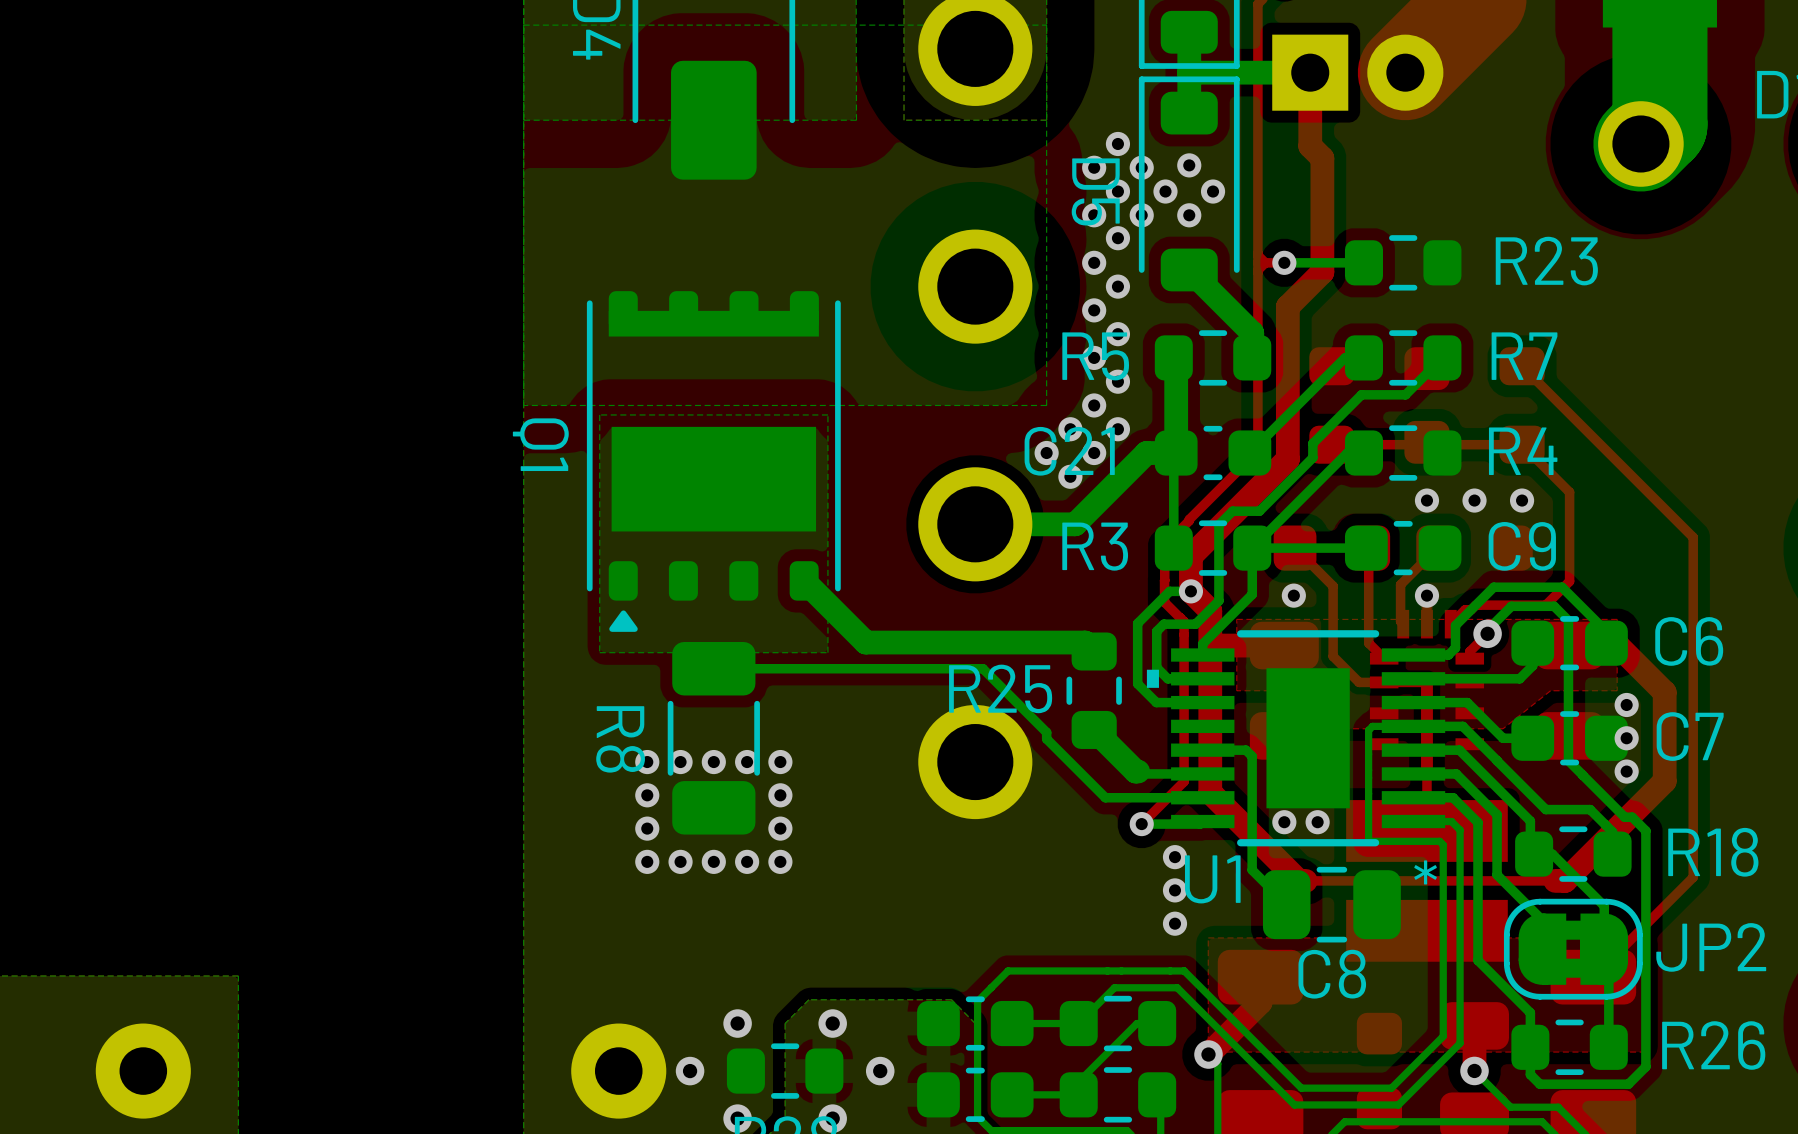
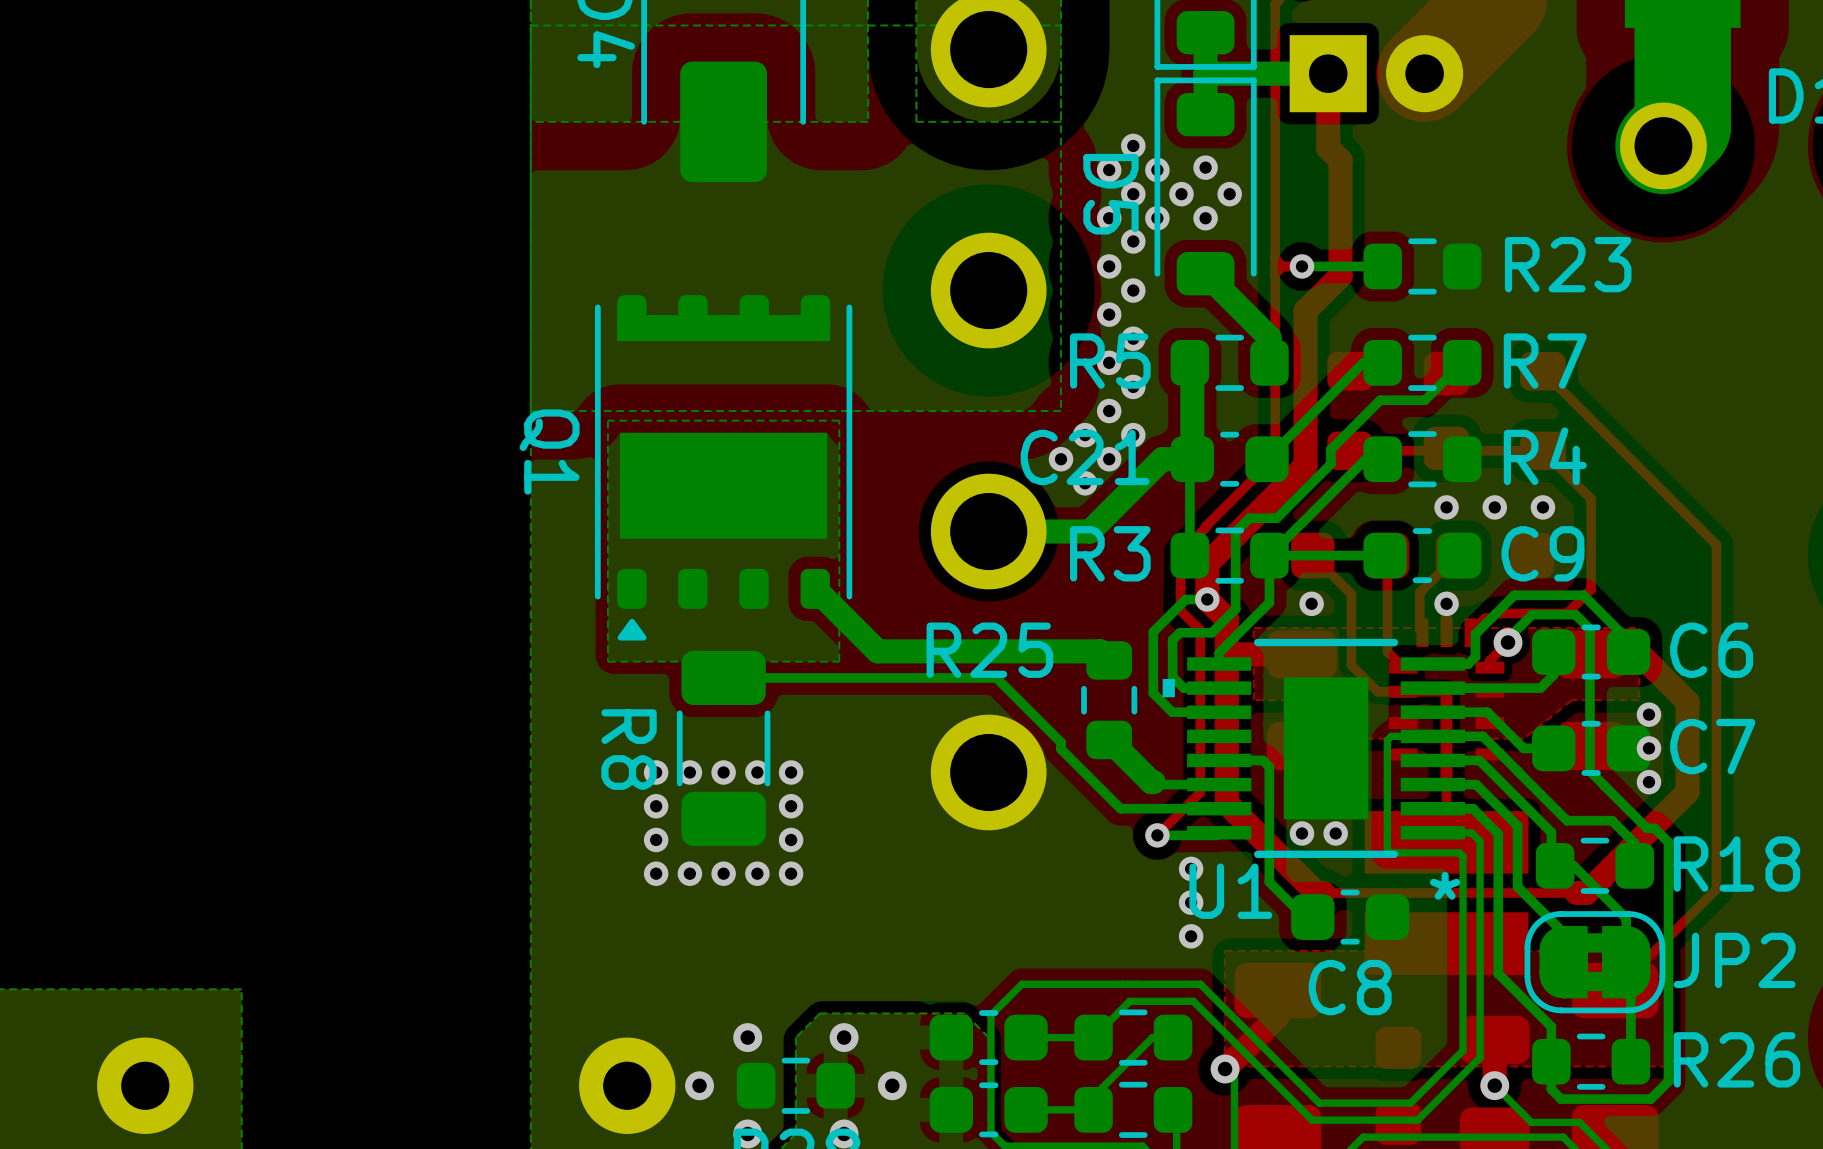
R25 name position: R25 (1000, 688) -> R25 (989, 650)
C8 footprint: [1262, 866, 1401, 943] -> [1291, 889, 1410, 945]

